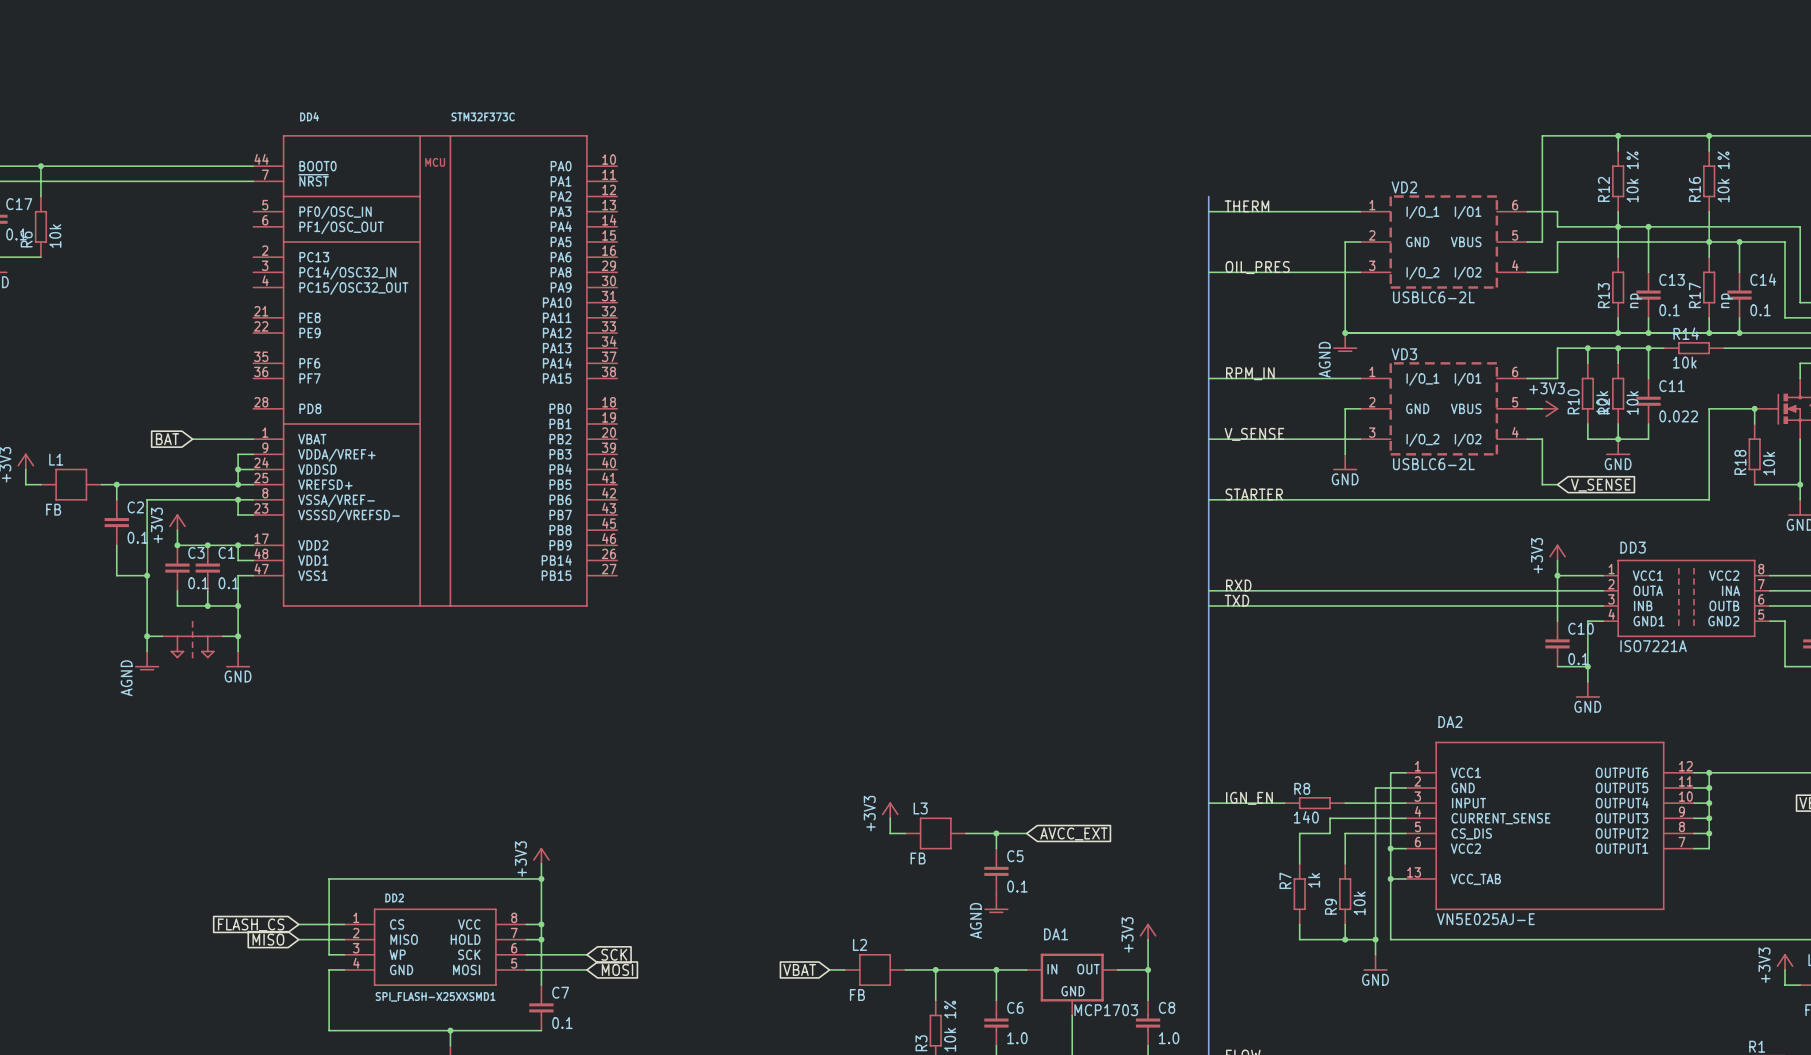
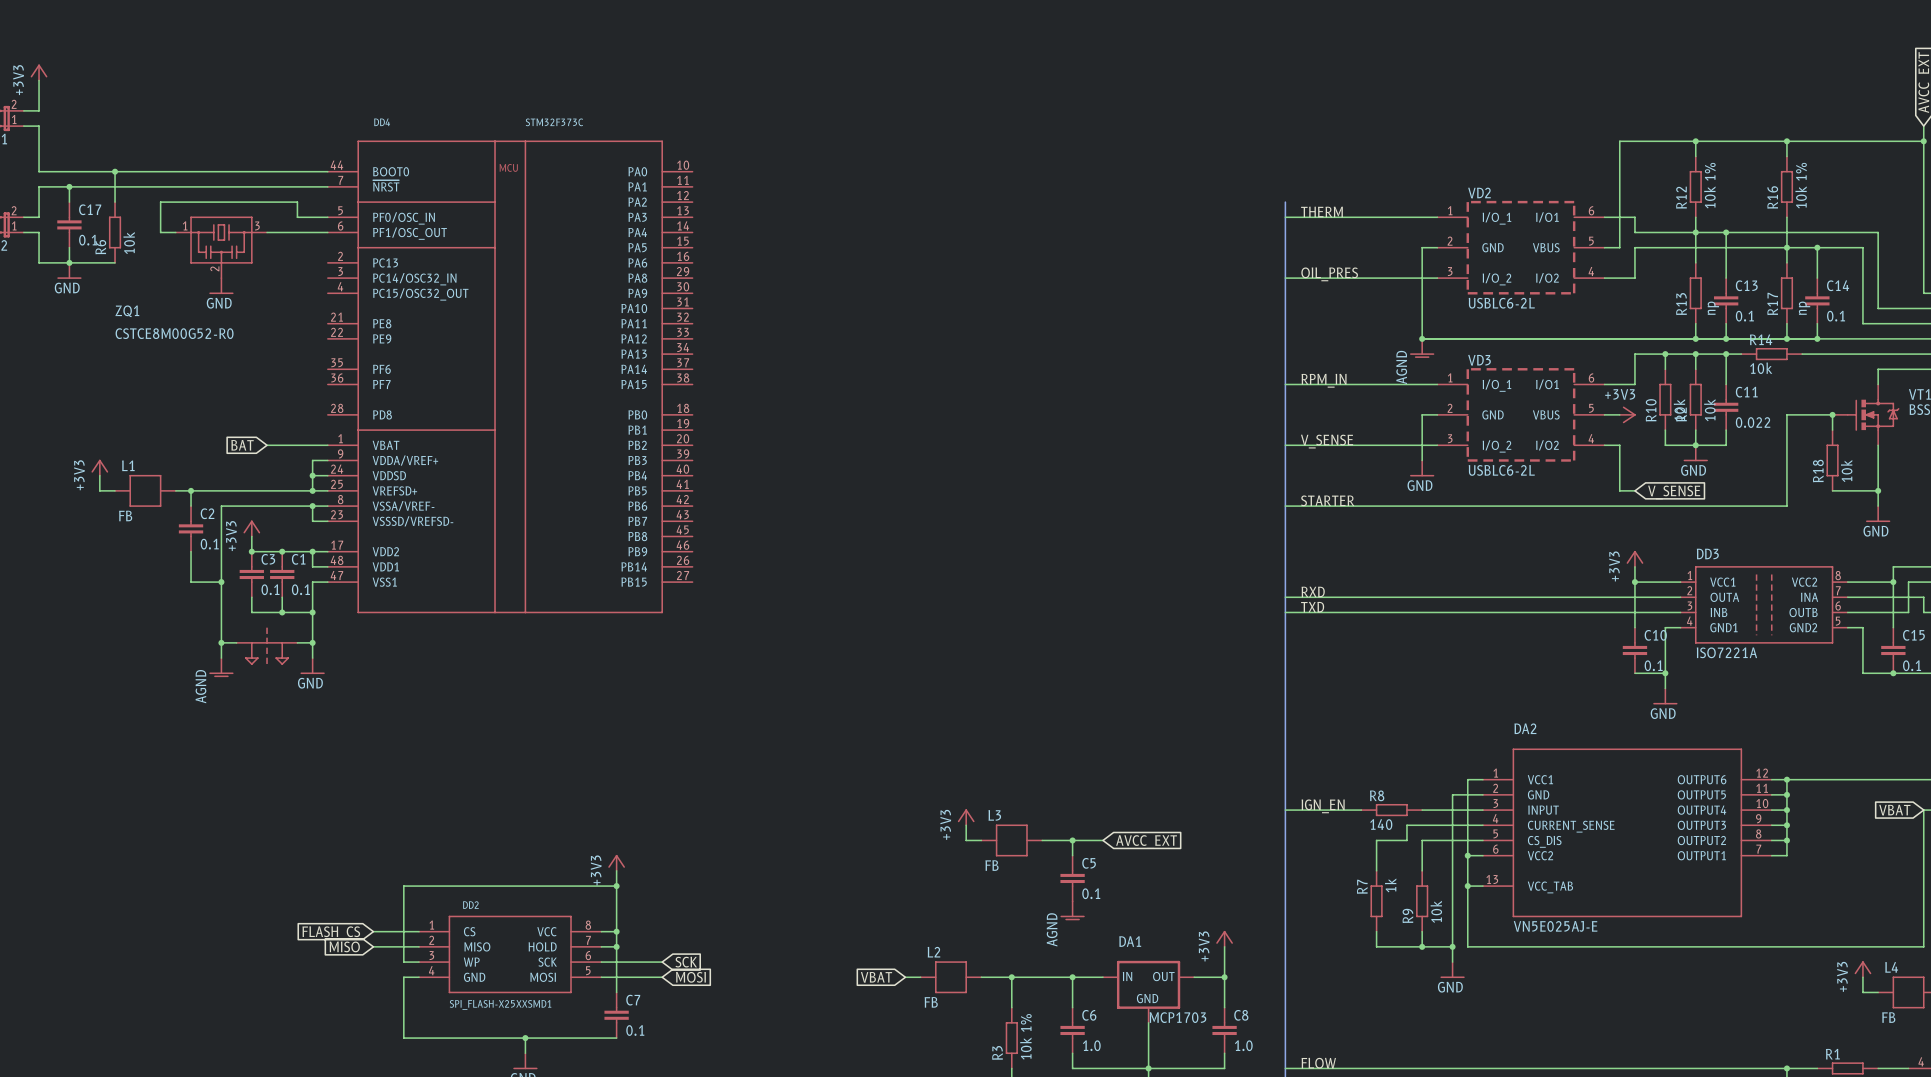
wire: none -> (327, 217) (297, 217) (297, 202) (160, 202) (160, 232) (175, 232)
wire: none -> (267, 232) (327, 232)
ZQ1: none -> CSTCE8M00G52-R0 (221, 247)
power symbol: none -> GND (221, 286)

